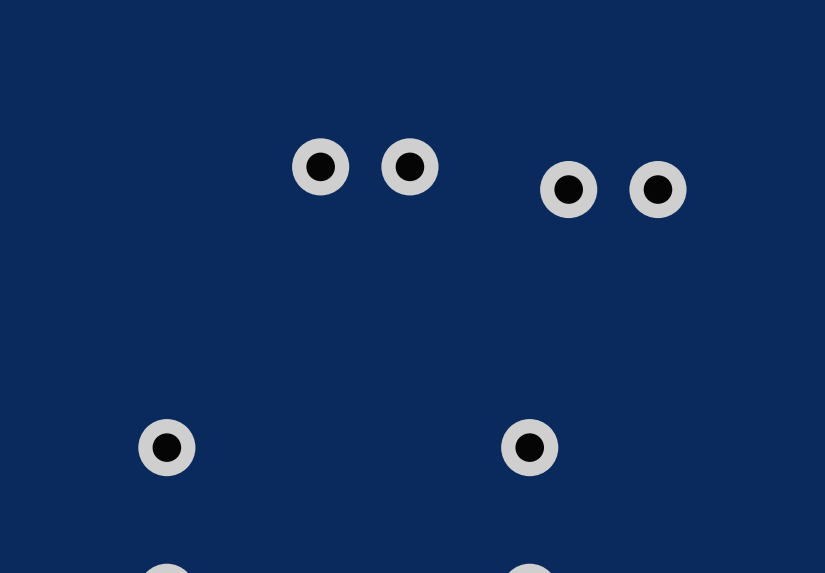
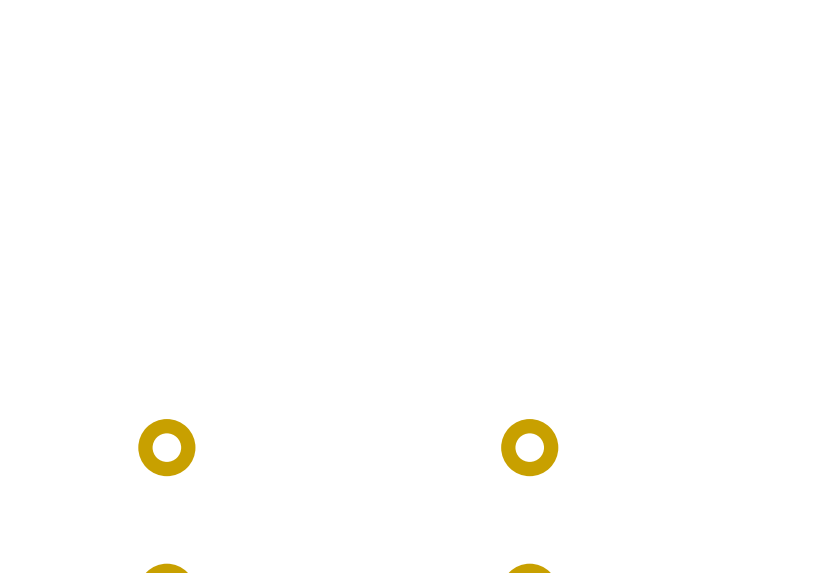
part: (365, 166) -> none
part: (613, 189) -> none

